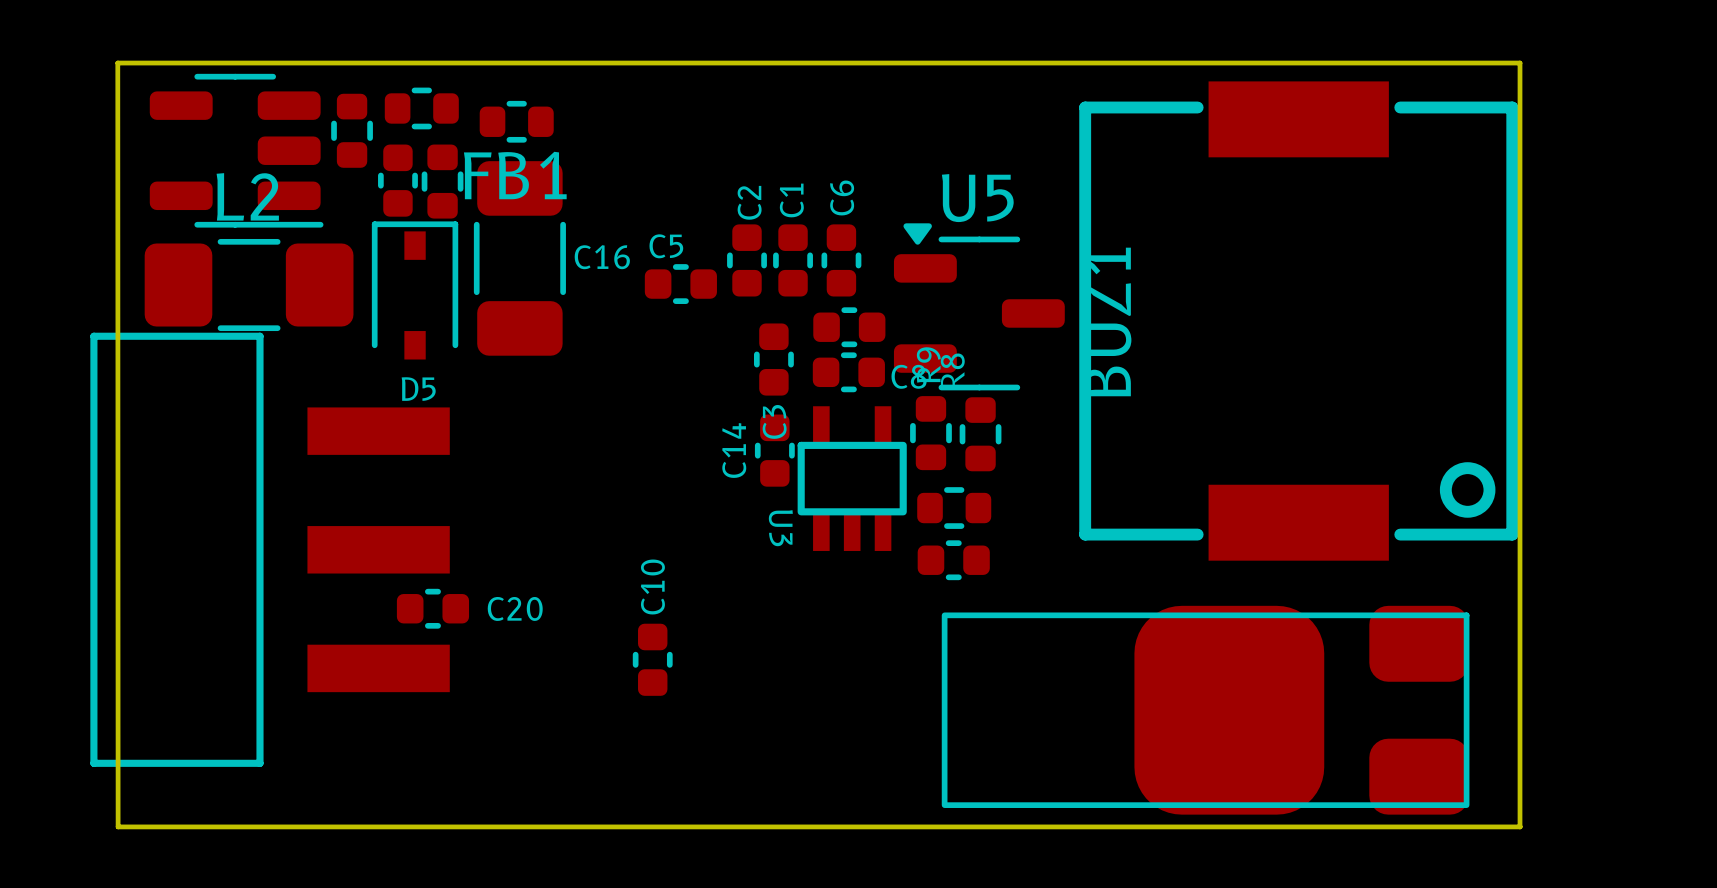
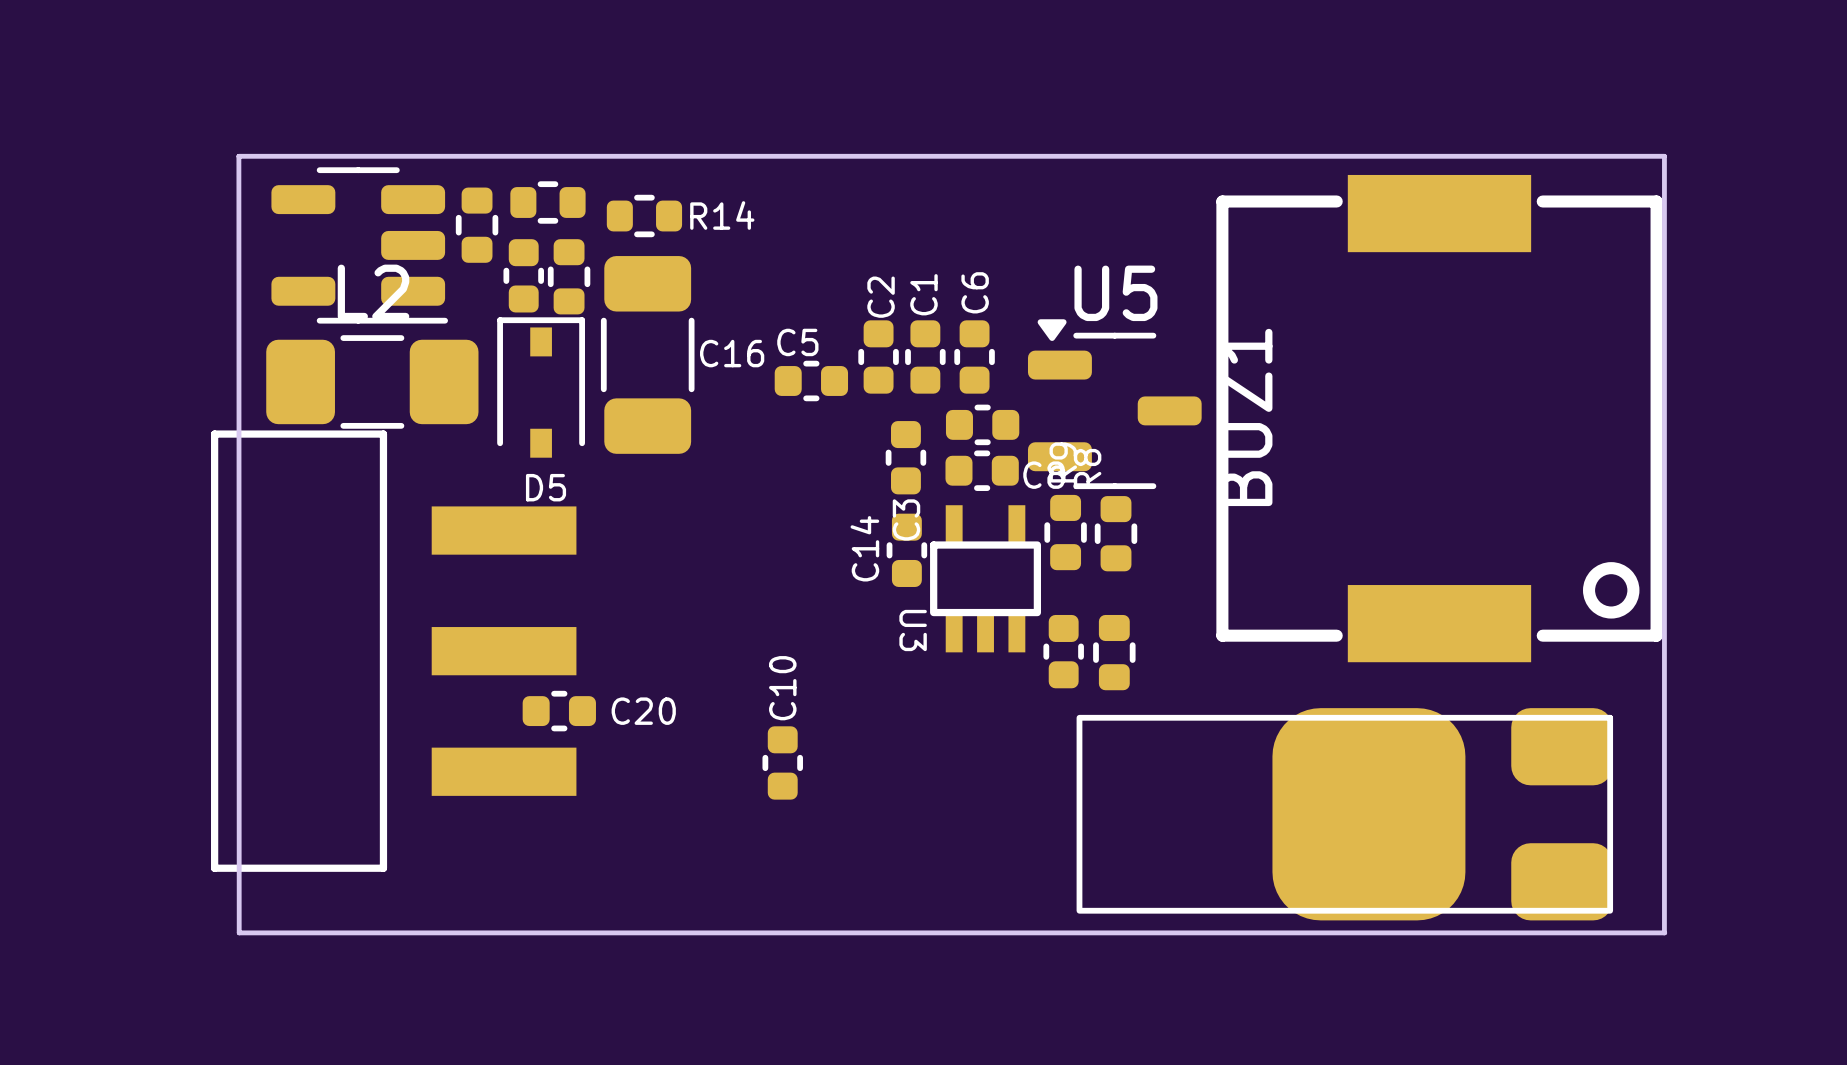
FB1 name: FB1 (515, 175) -> R14 (722, 215)
part rotation: 0° (954, 508) -> 90° clockwise (1114, 652)
part position: (954, 508) -> (1114, 652)
part rotation: 0° (953, 560) -> 90° clockwise (1063, 651)

